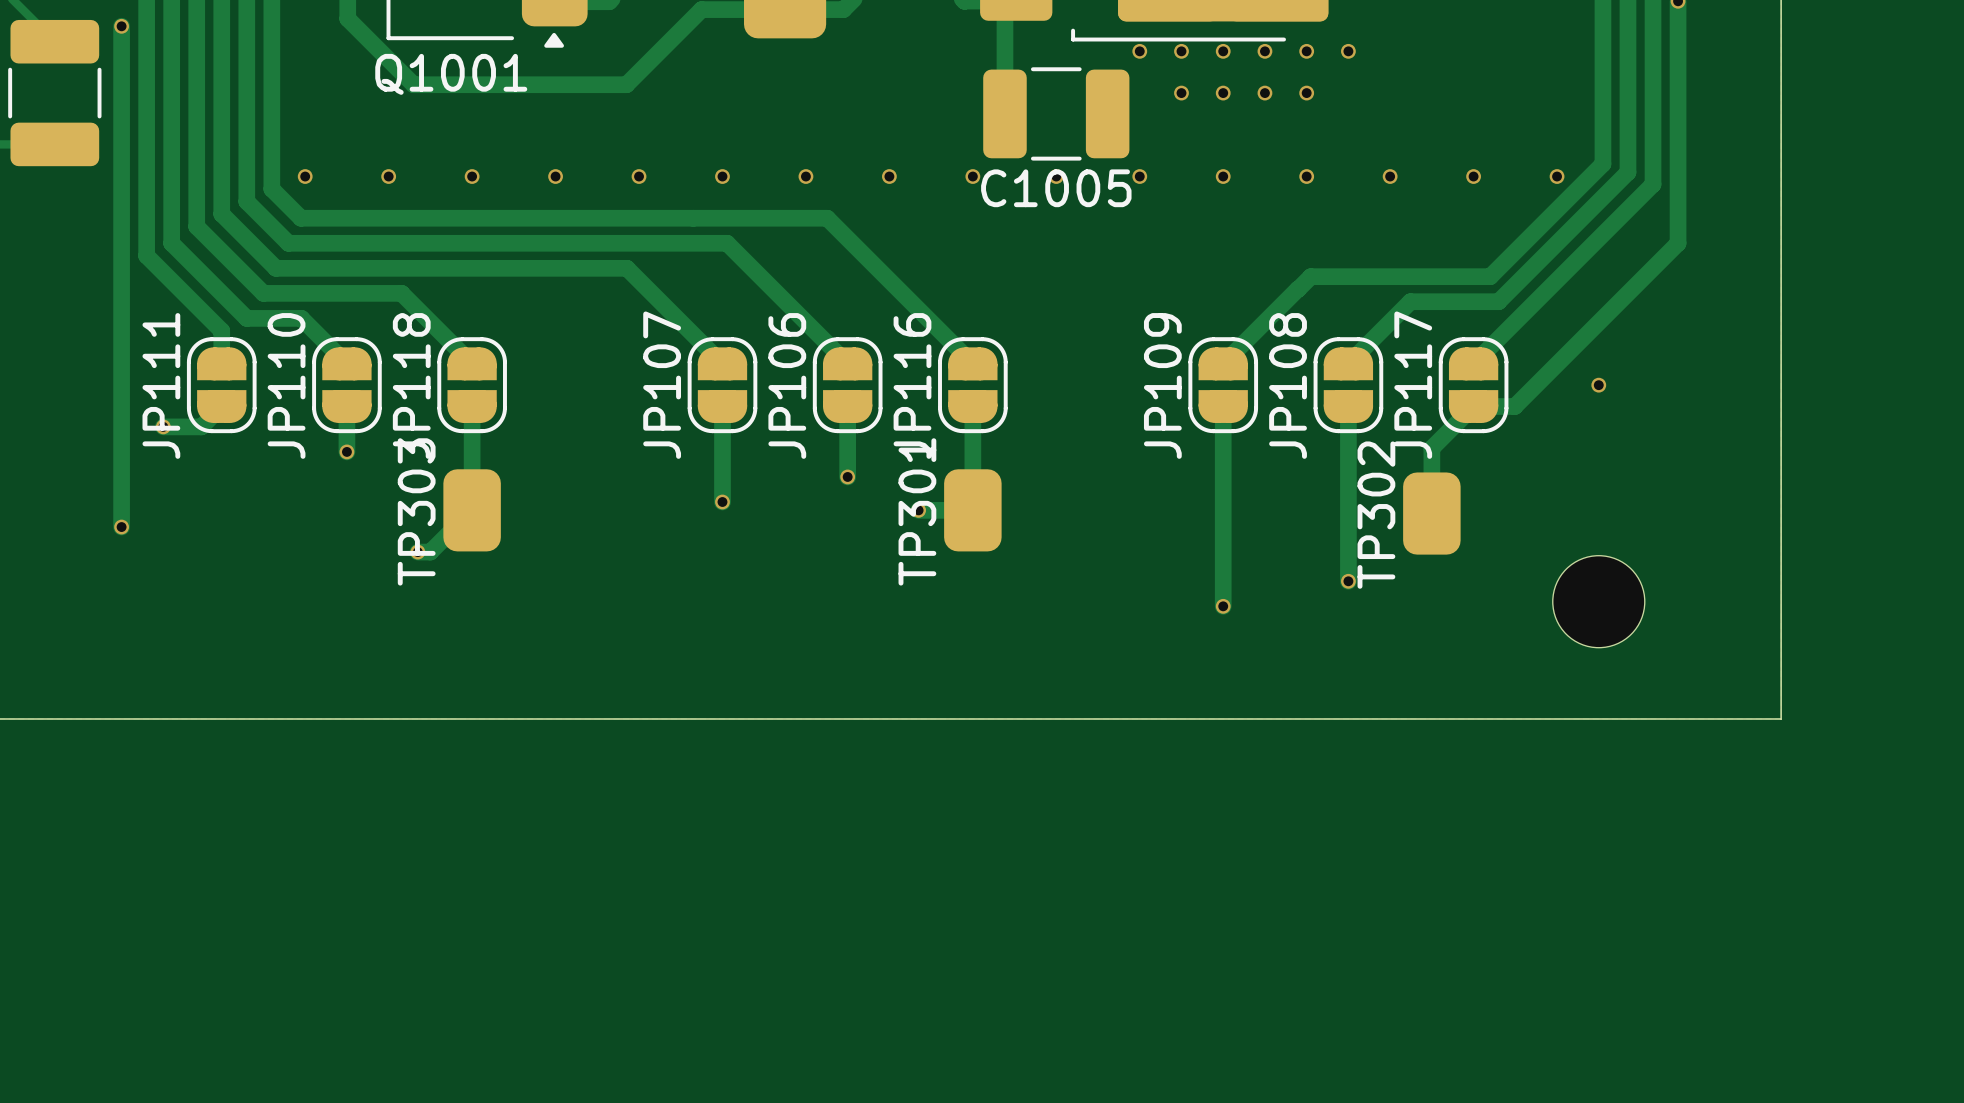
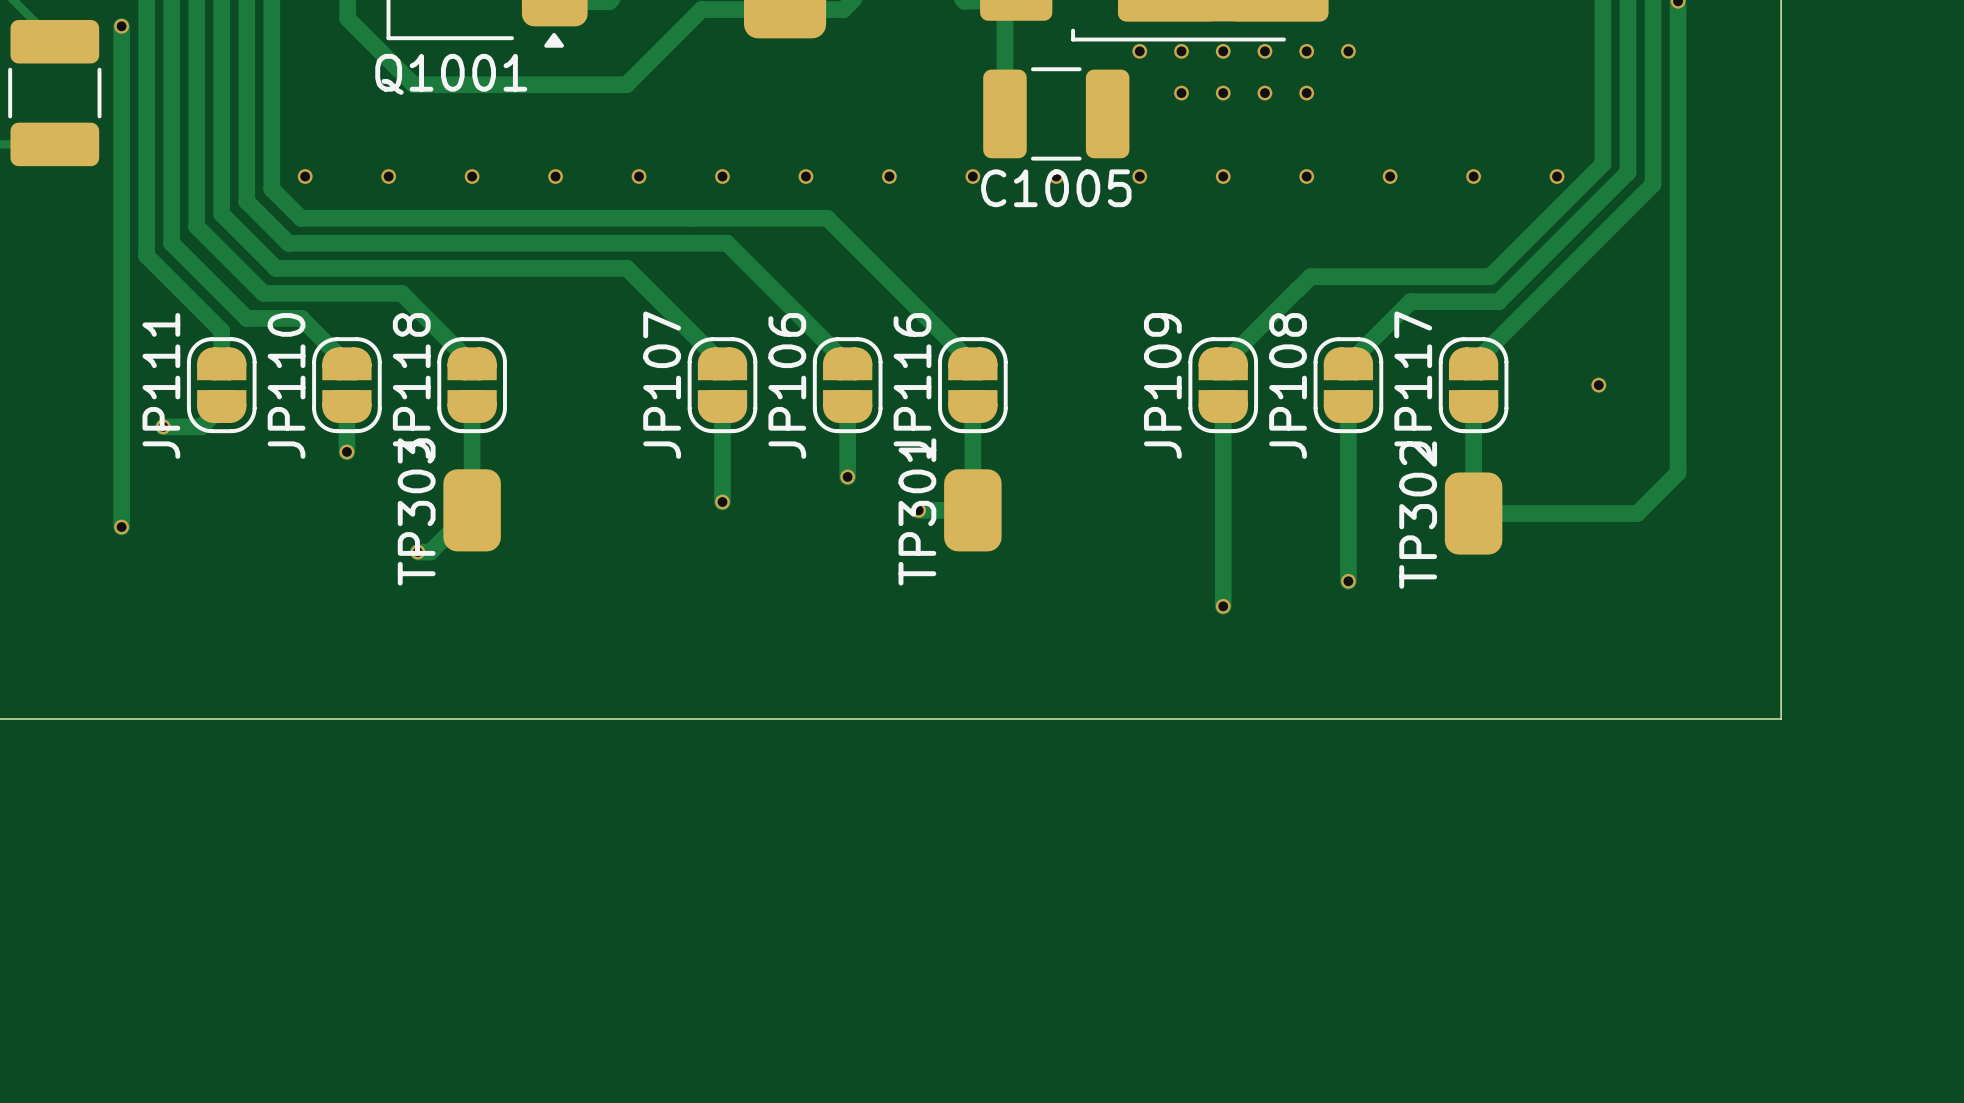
track: (1678, 243) (1514, 406) (1473, 406) (1431, 448) (1431, 513) -> (1678, 243) (1678, 472) (1637, 513) (1473, 513) (1473, 406)
TP302 position: (1431, 513) -> (1473, 513)
part: (1598, 601) -> none

